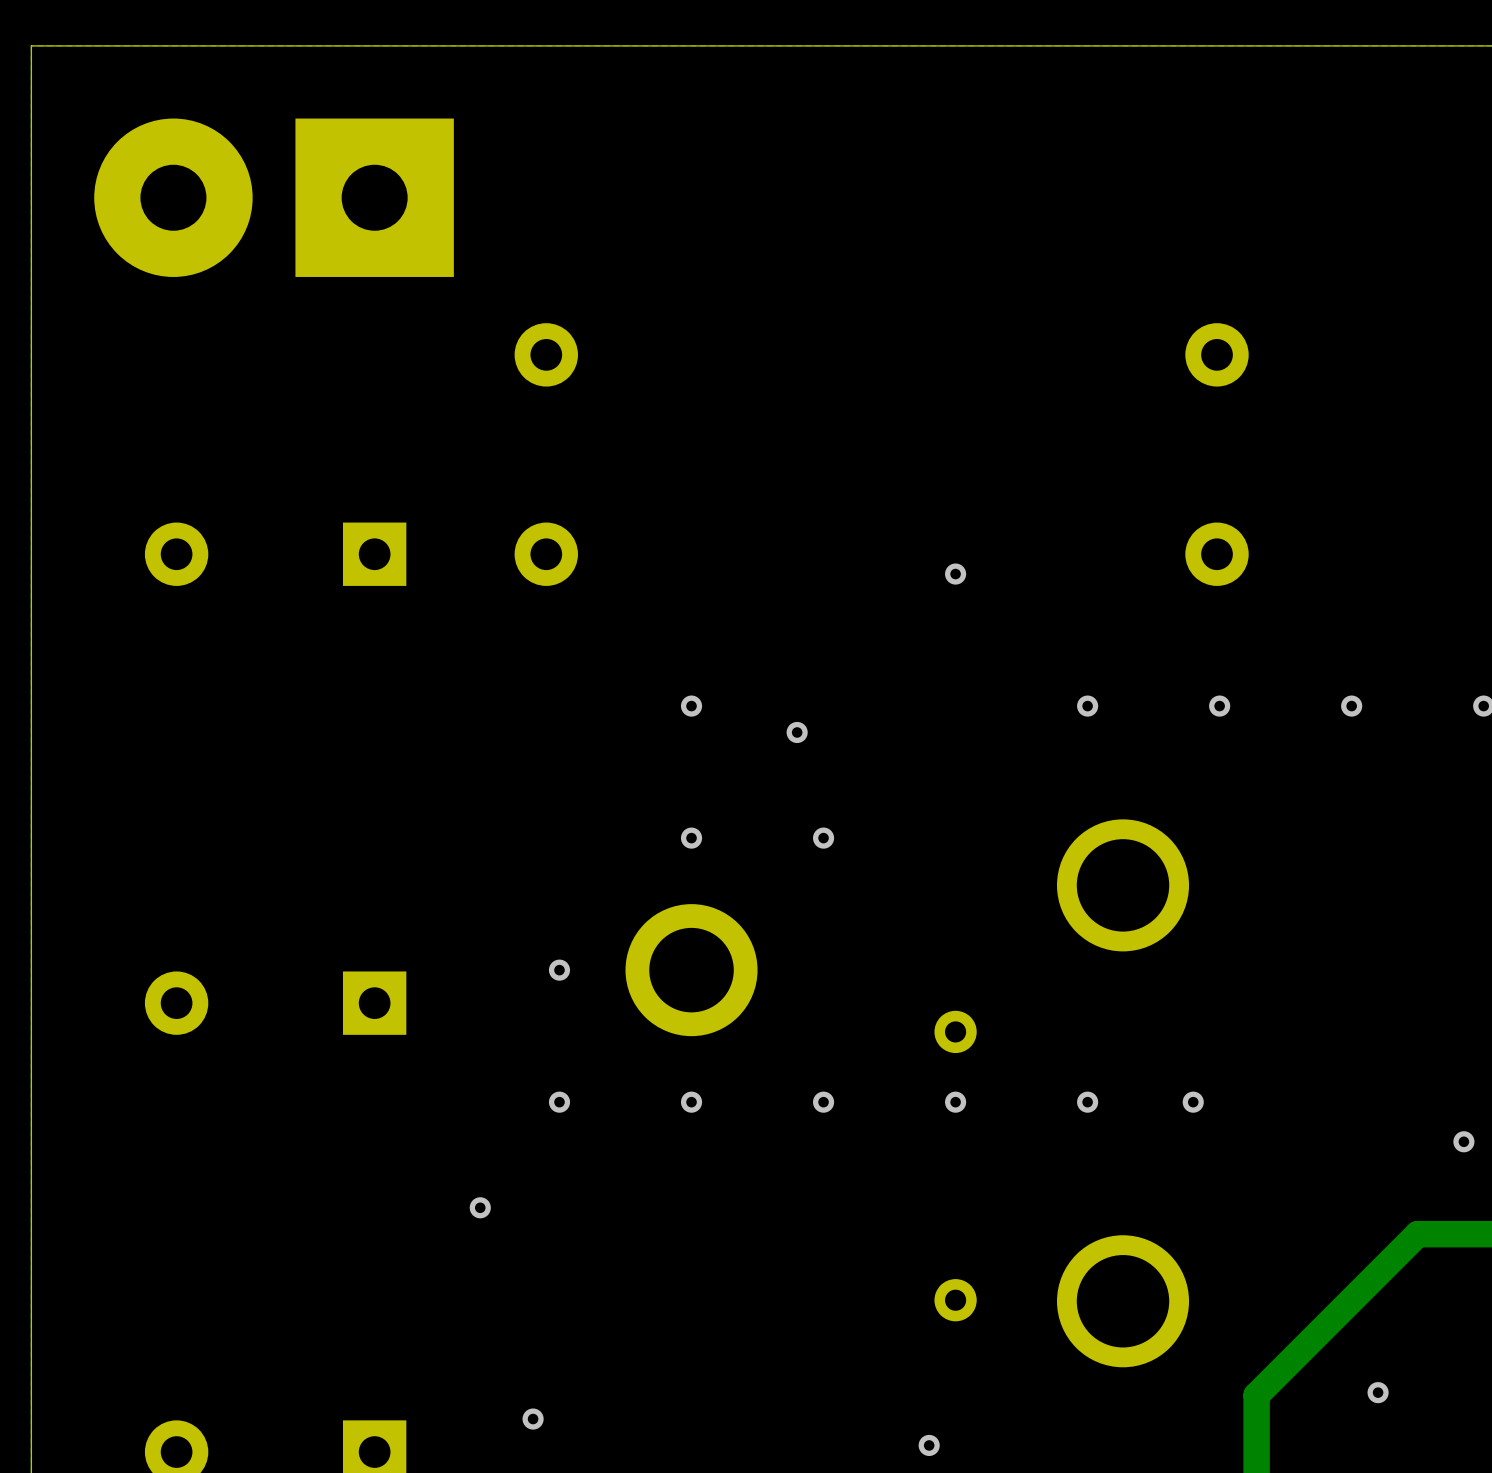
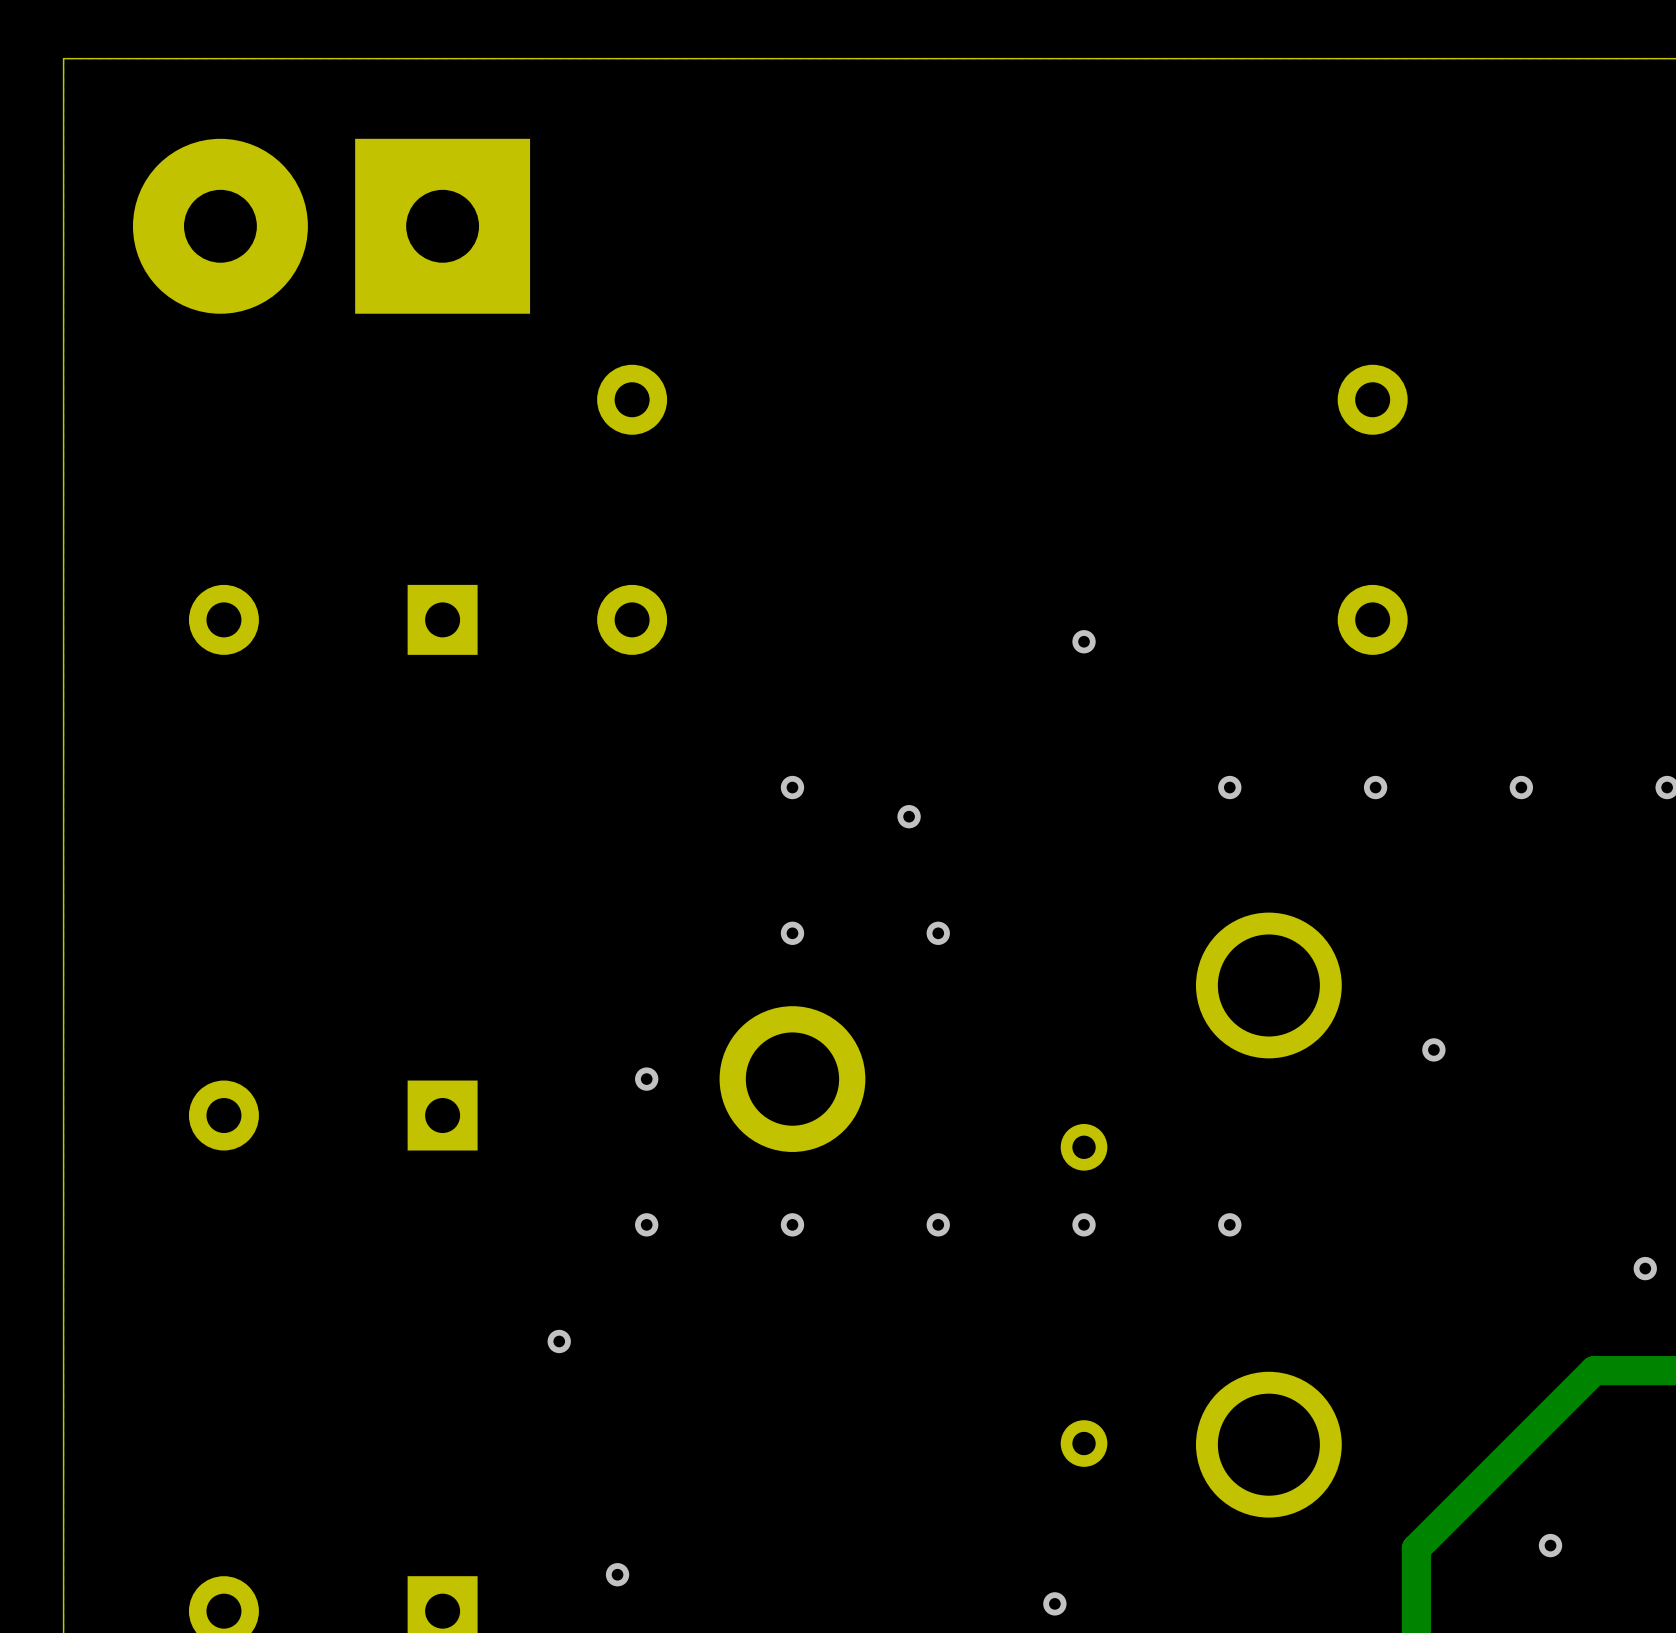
via: none -> (1433, 1049)
via: (1193, 1102) -> none

